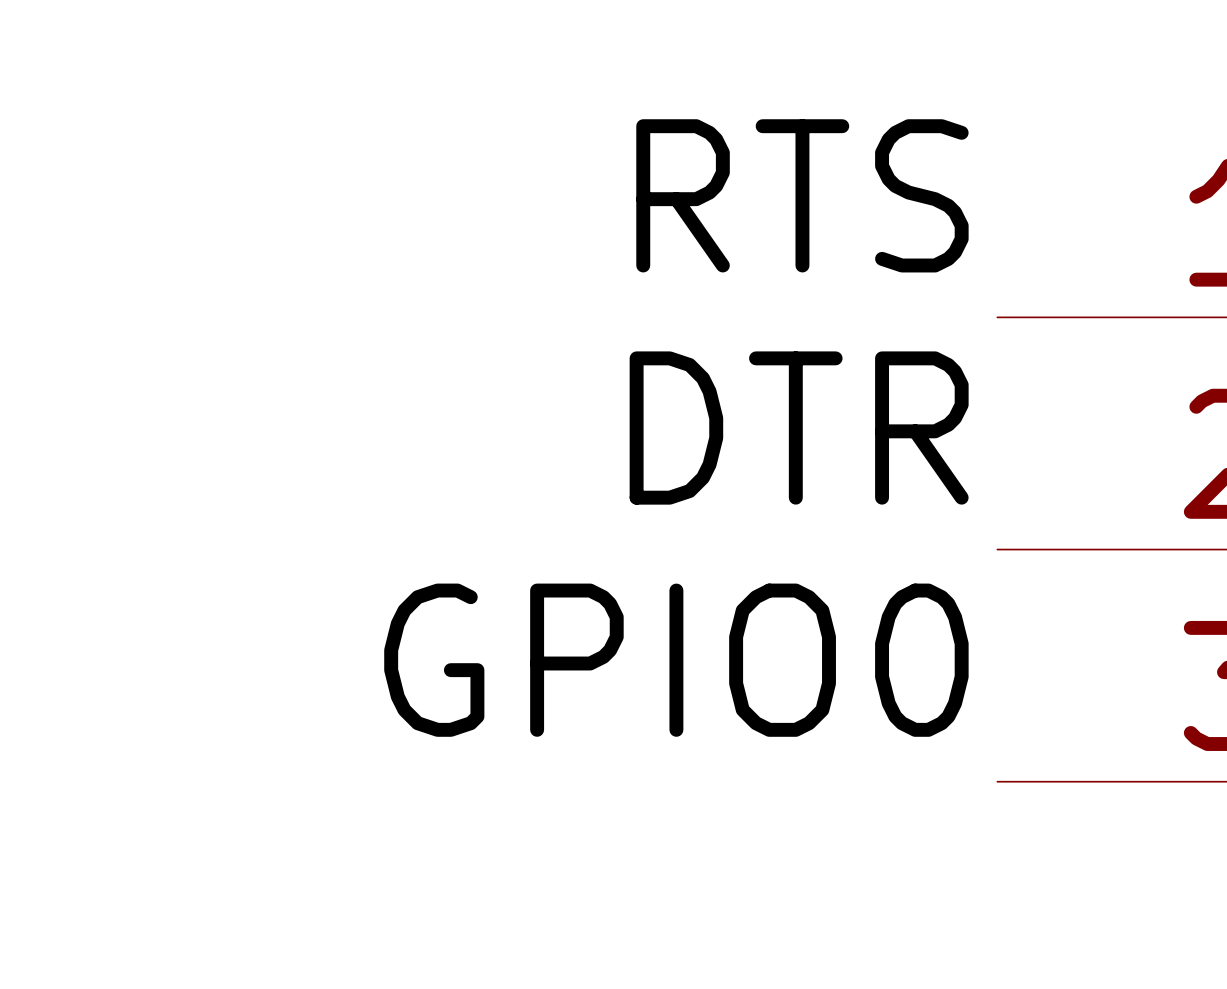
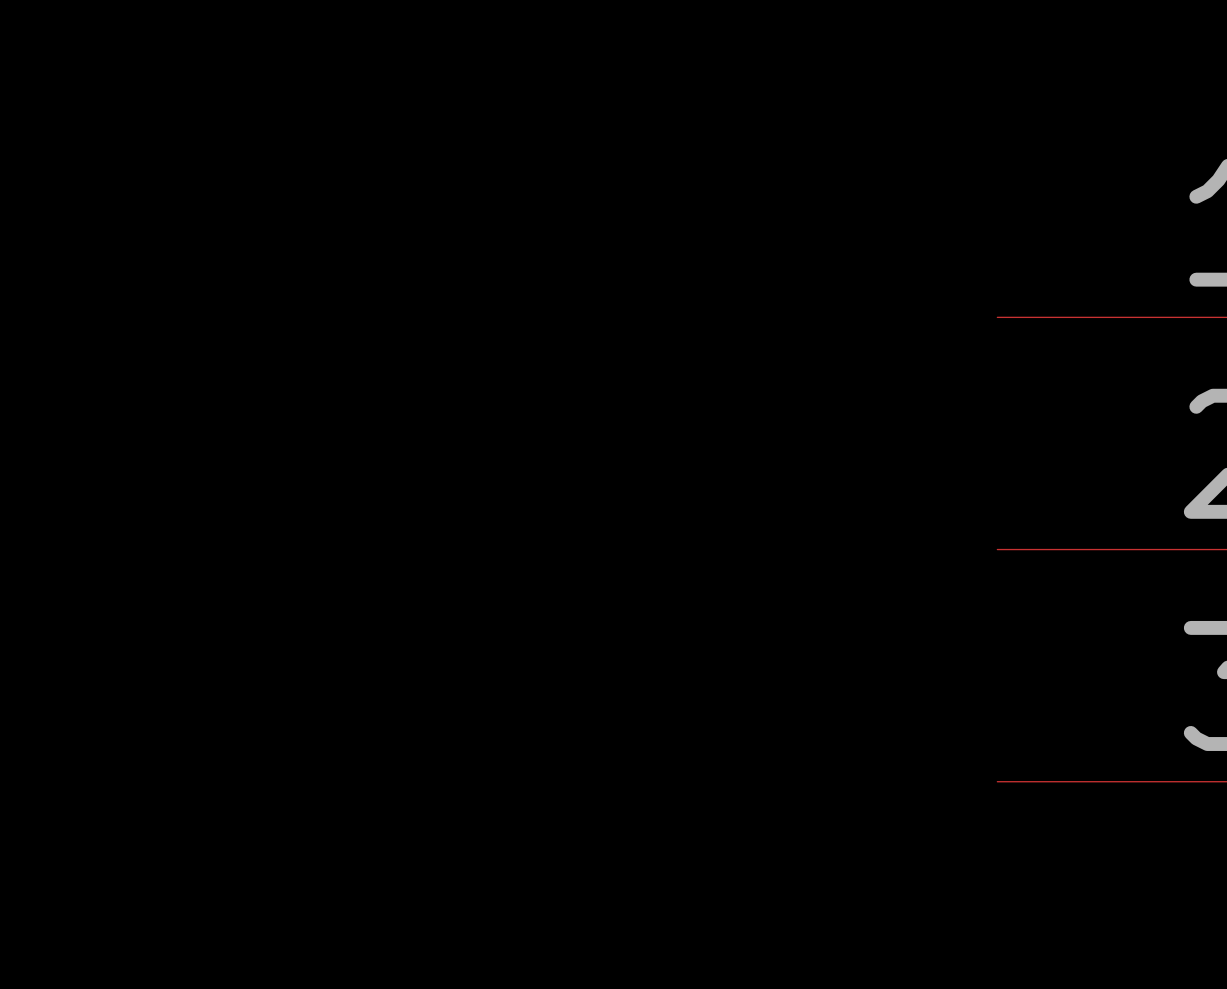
label: RTS (802, 195) -> none
label: DTR (799, 428) -> none
label: GPIO0 (676, 660) -> none

